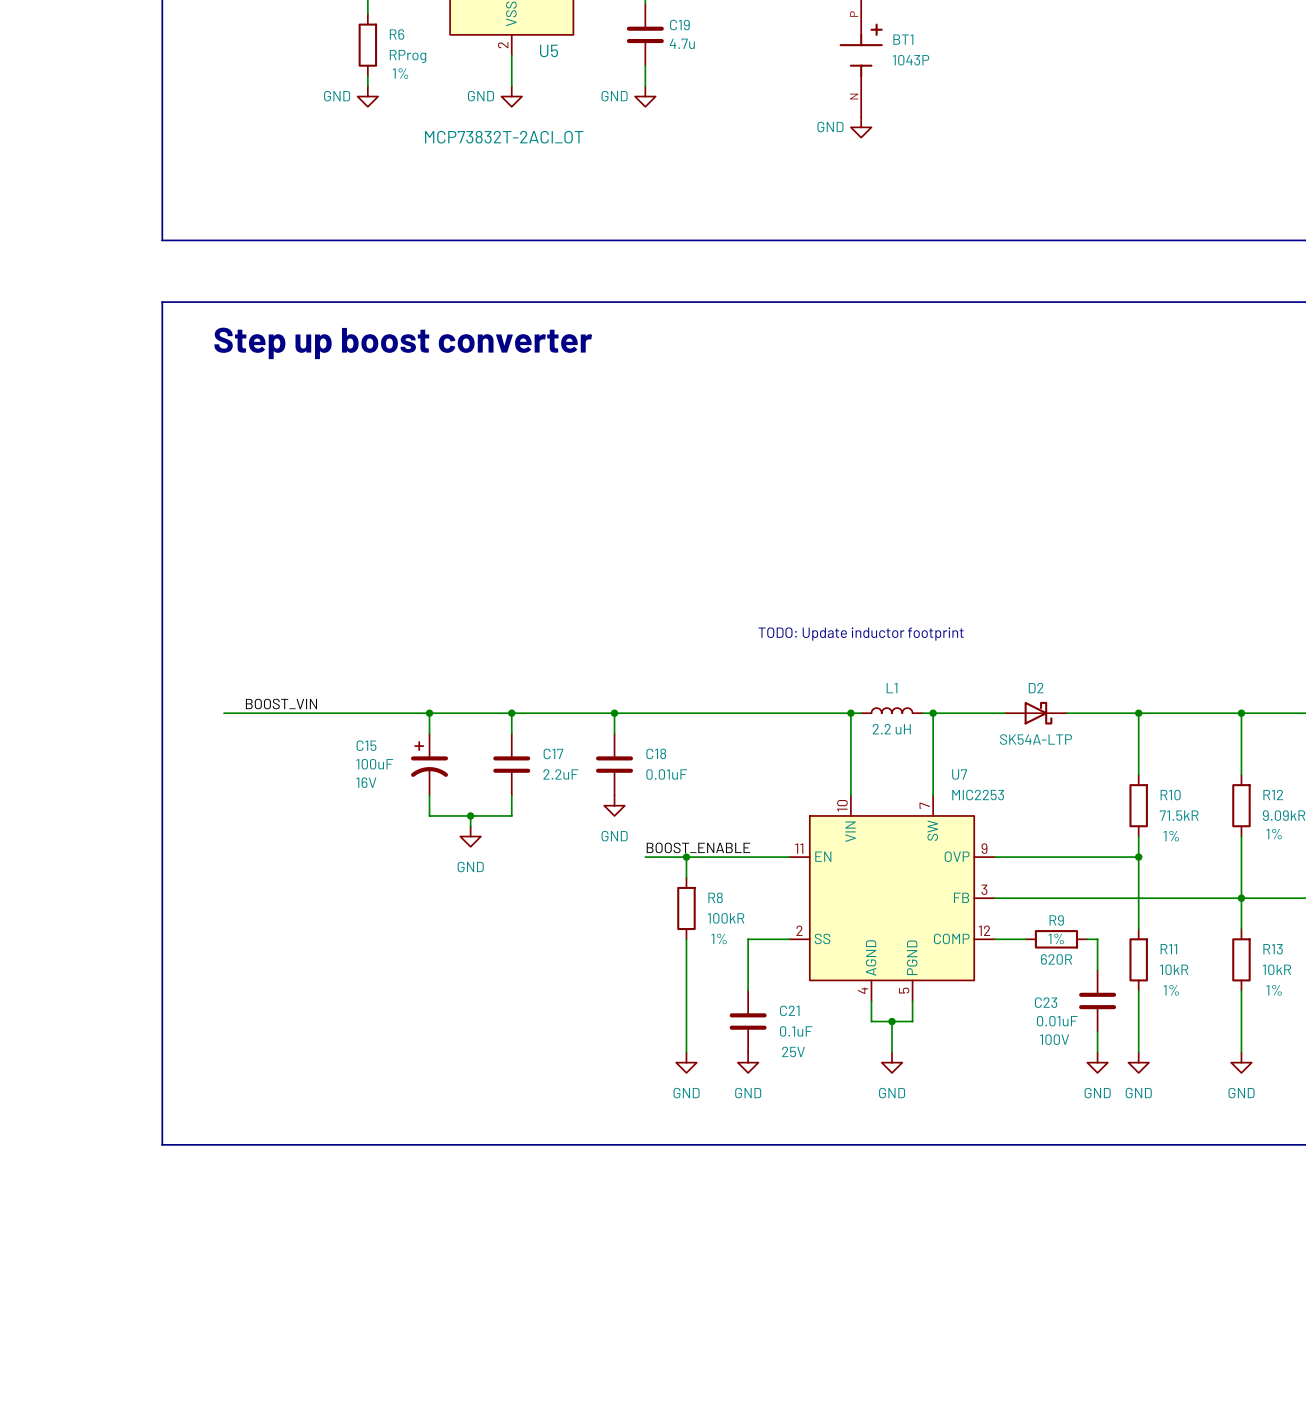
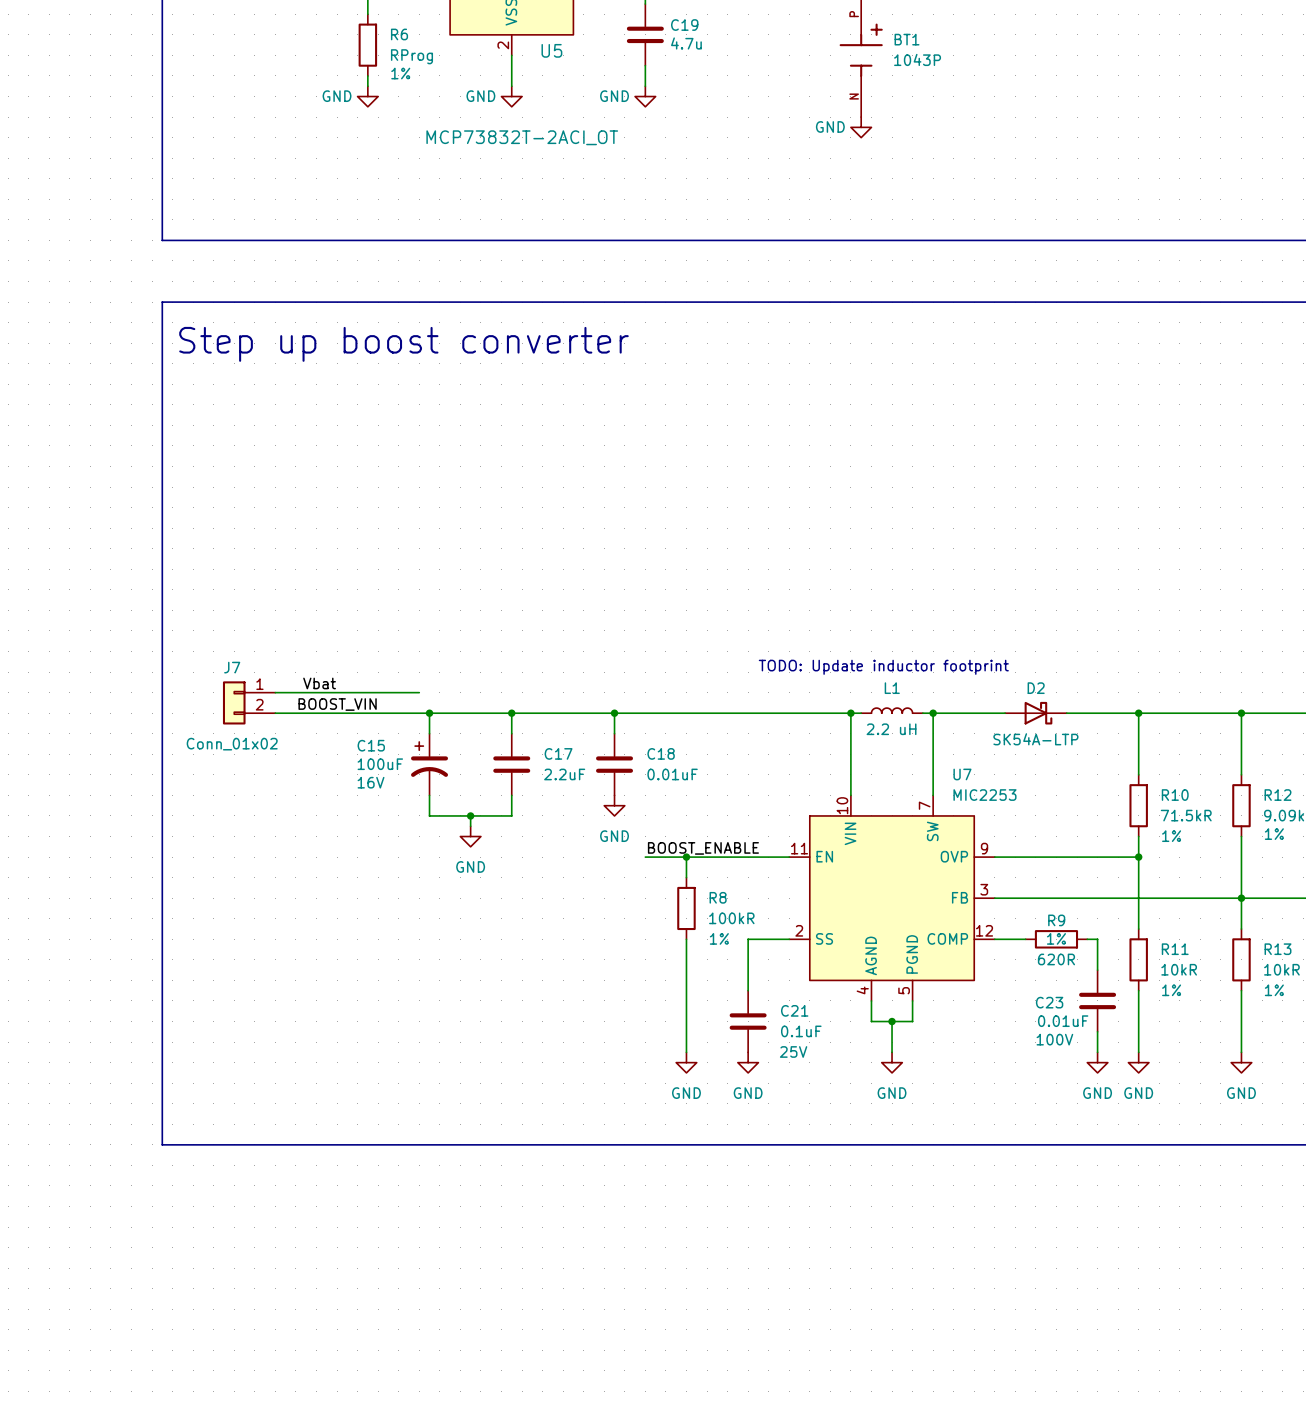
text position: TODO: Update inductor footprint (861, 634) -> TODO: Update inductor footprint (883, 667)
label: none -> Vbat (319, 683)
wire: none -> (275, 692) (419, 692)
J7: none -> Conn_01x02 (249, 702)
label position: BOOST_VIN (281, 704) -> BOOST_VIN (337, 704)

